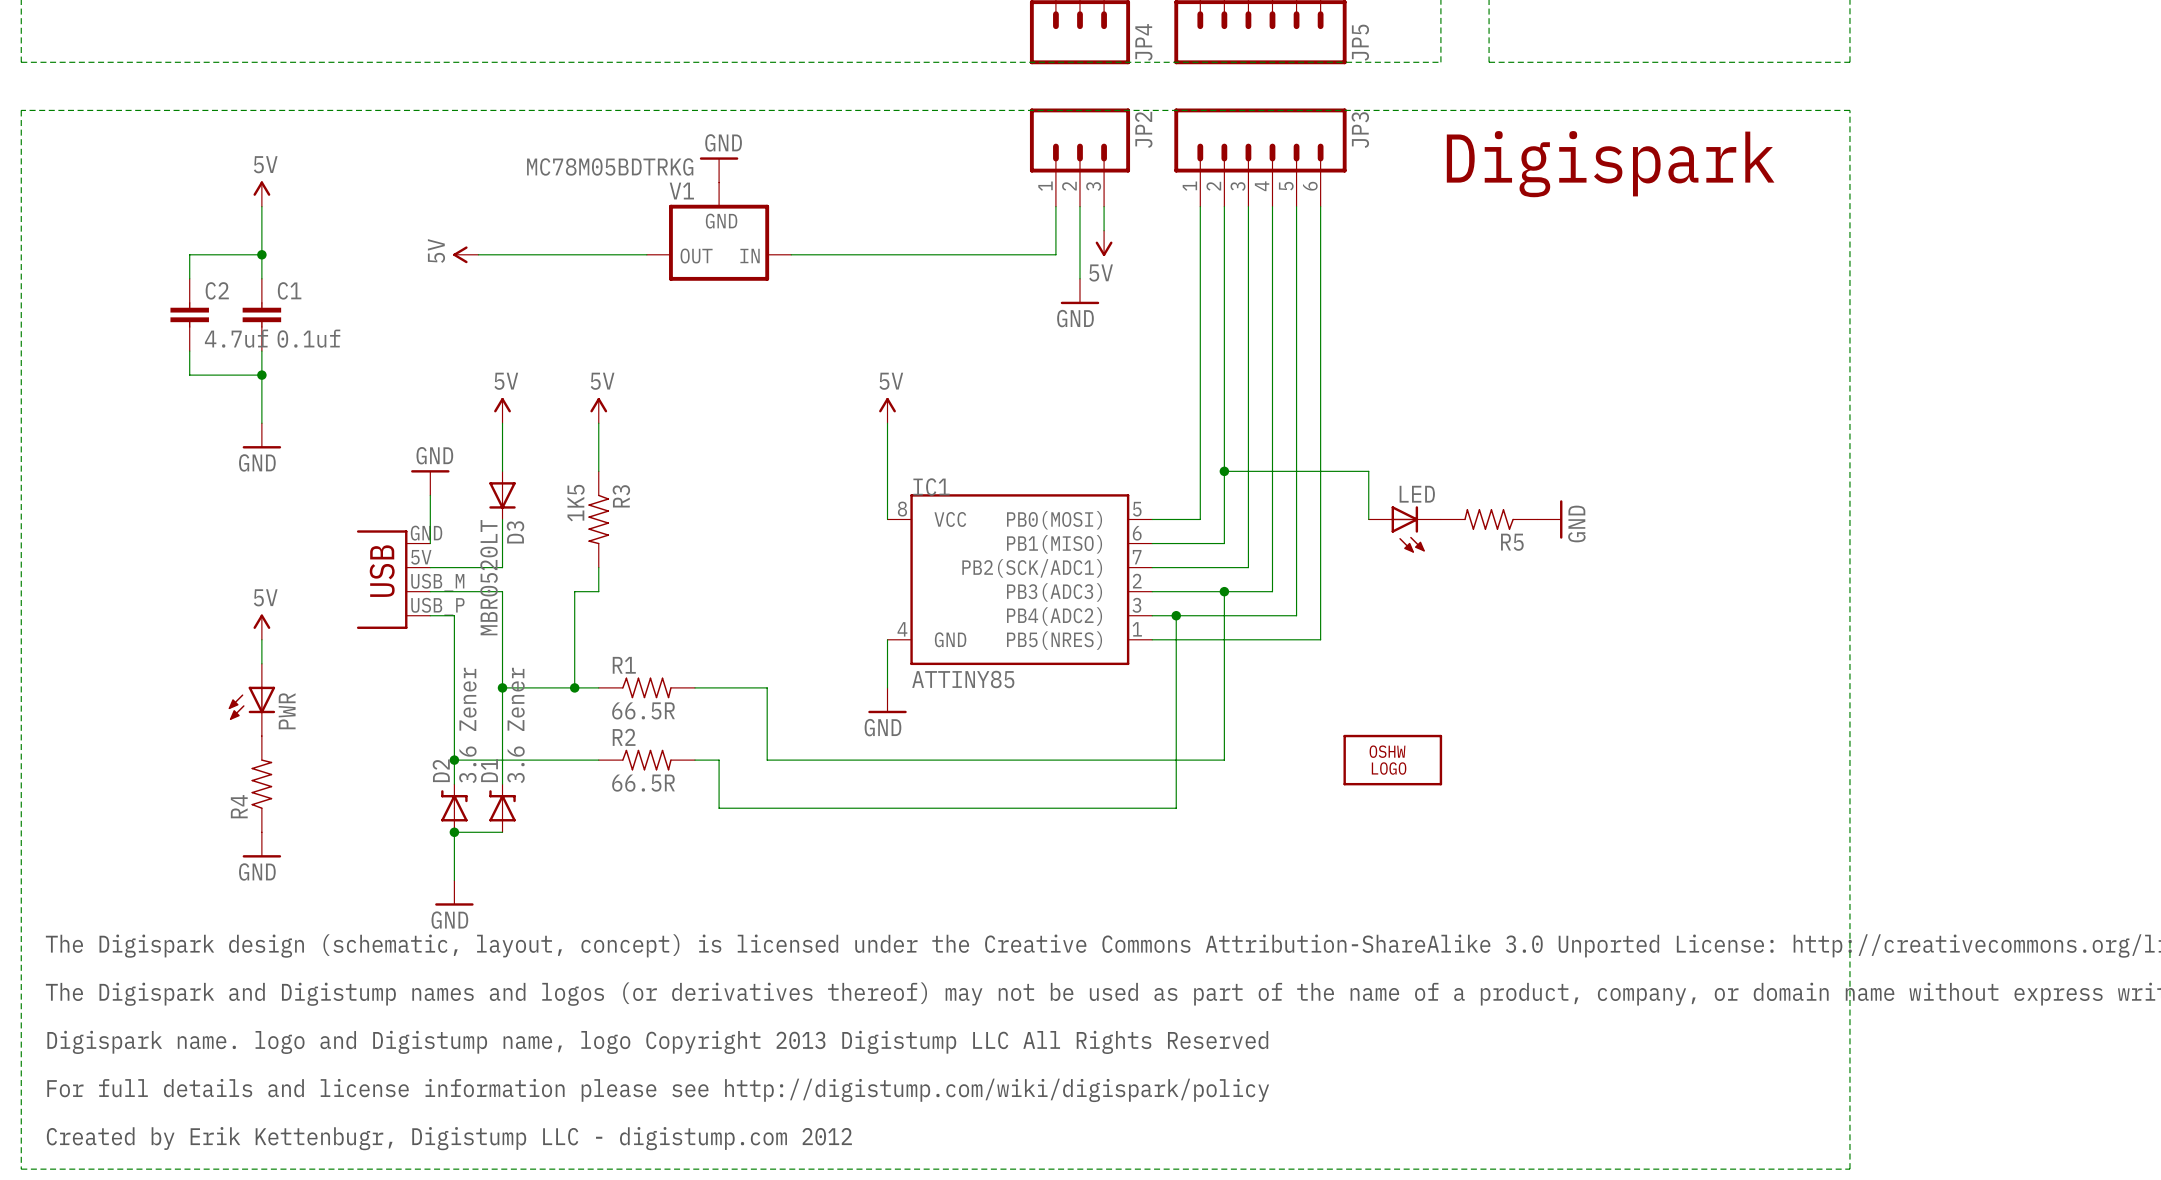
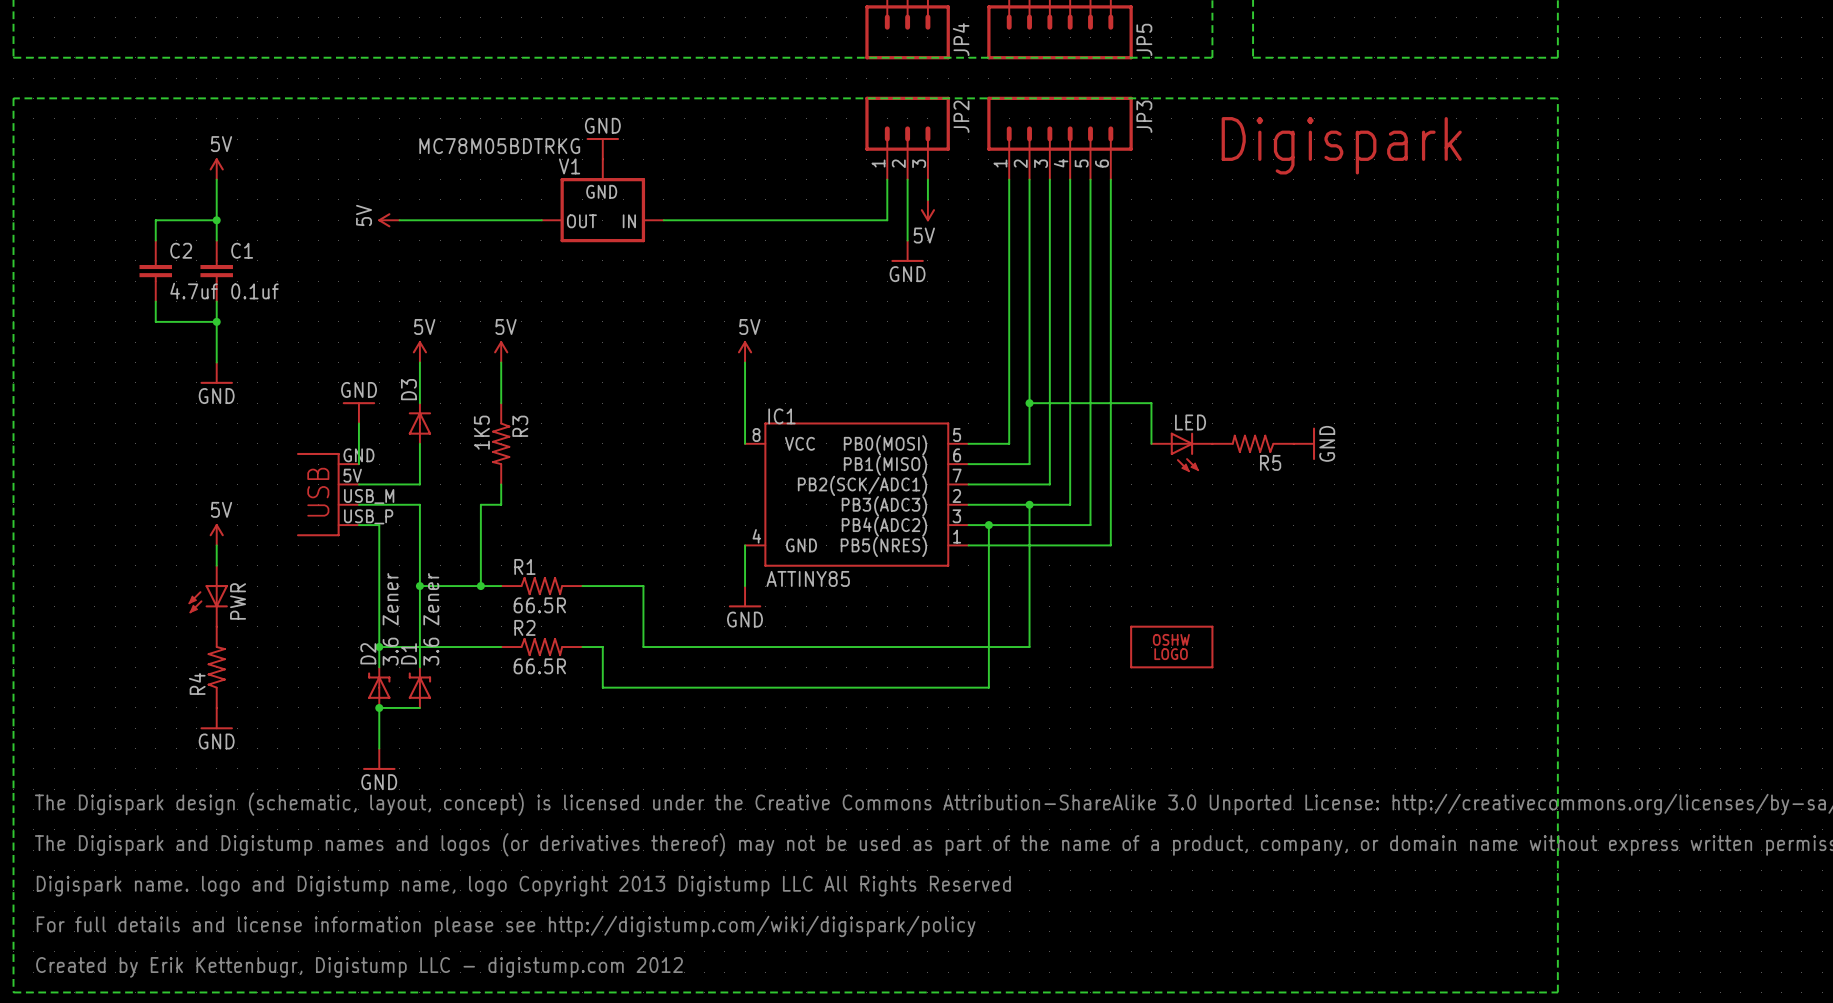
D3 rotation: 0° (502, 495) -> 180° (419, 423)
D3 value: MBR0520LT (489, 577) -> none

